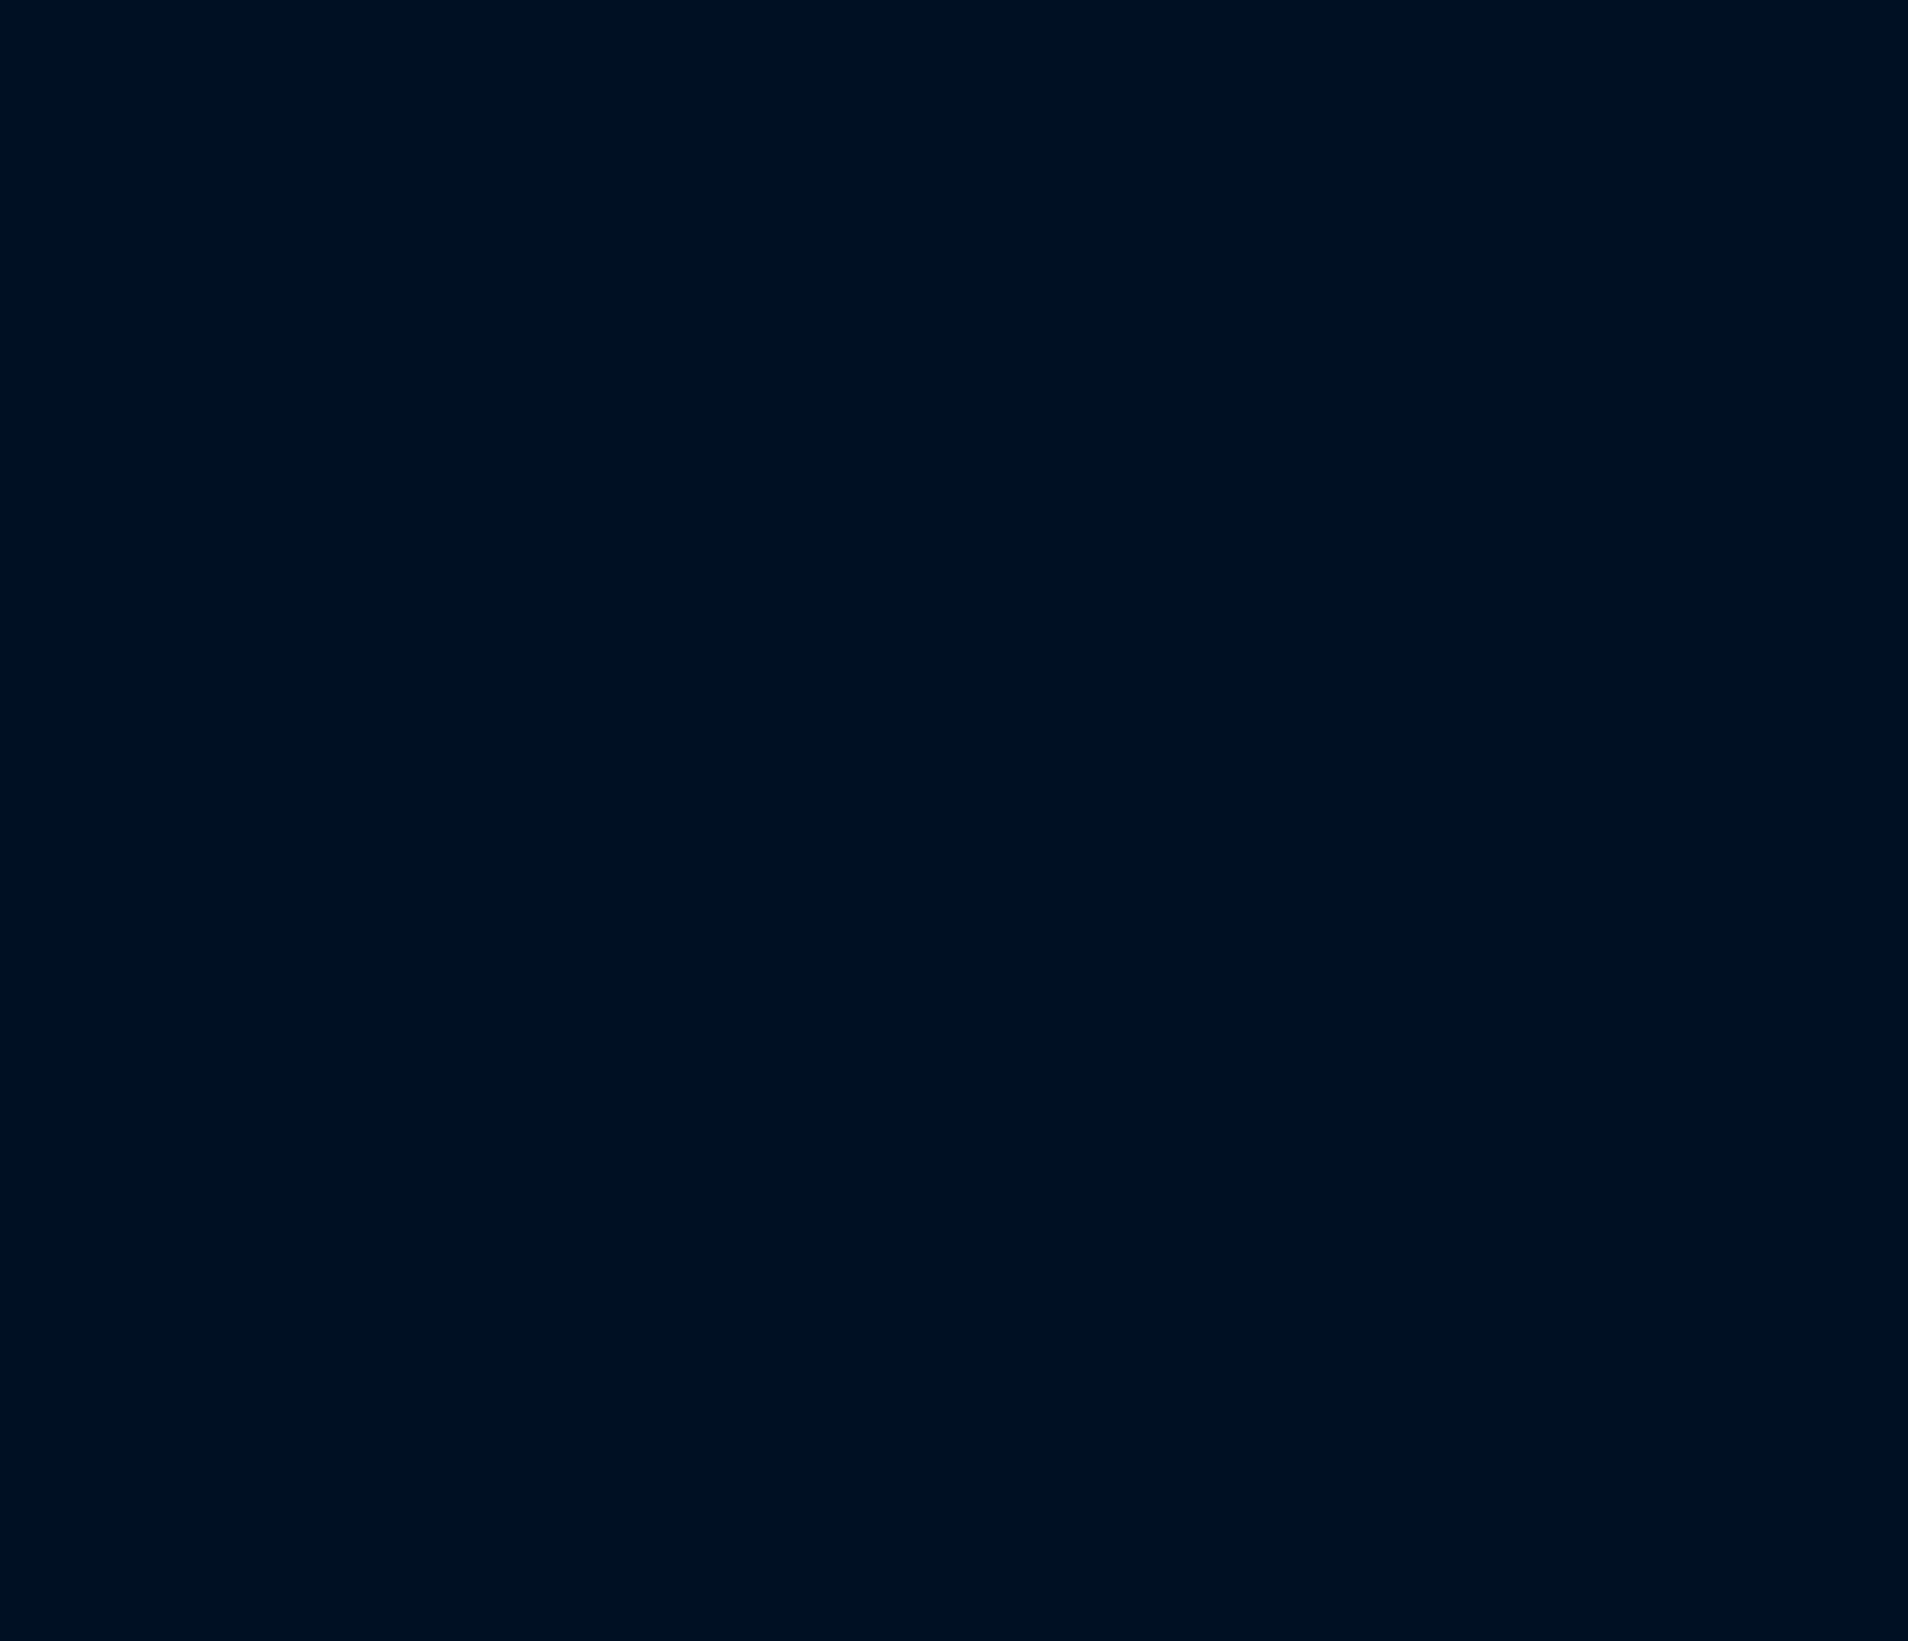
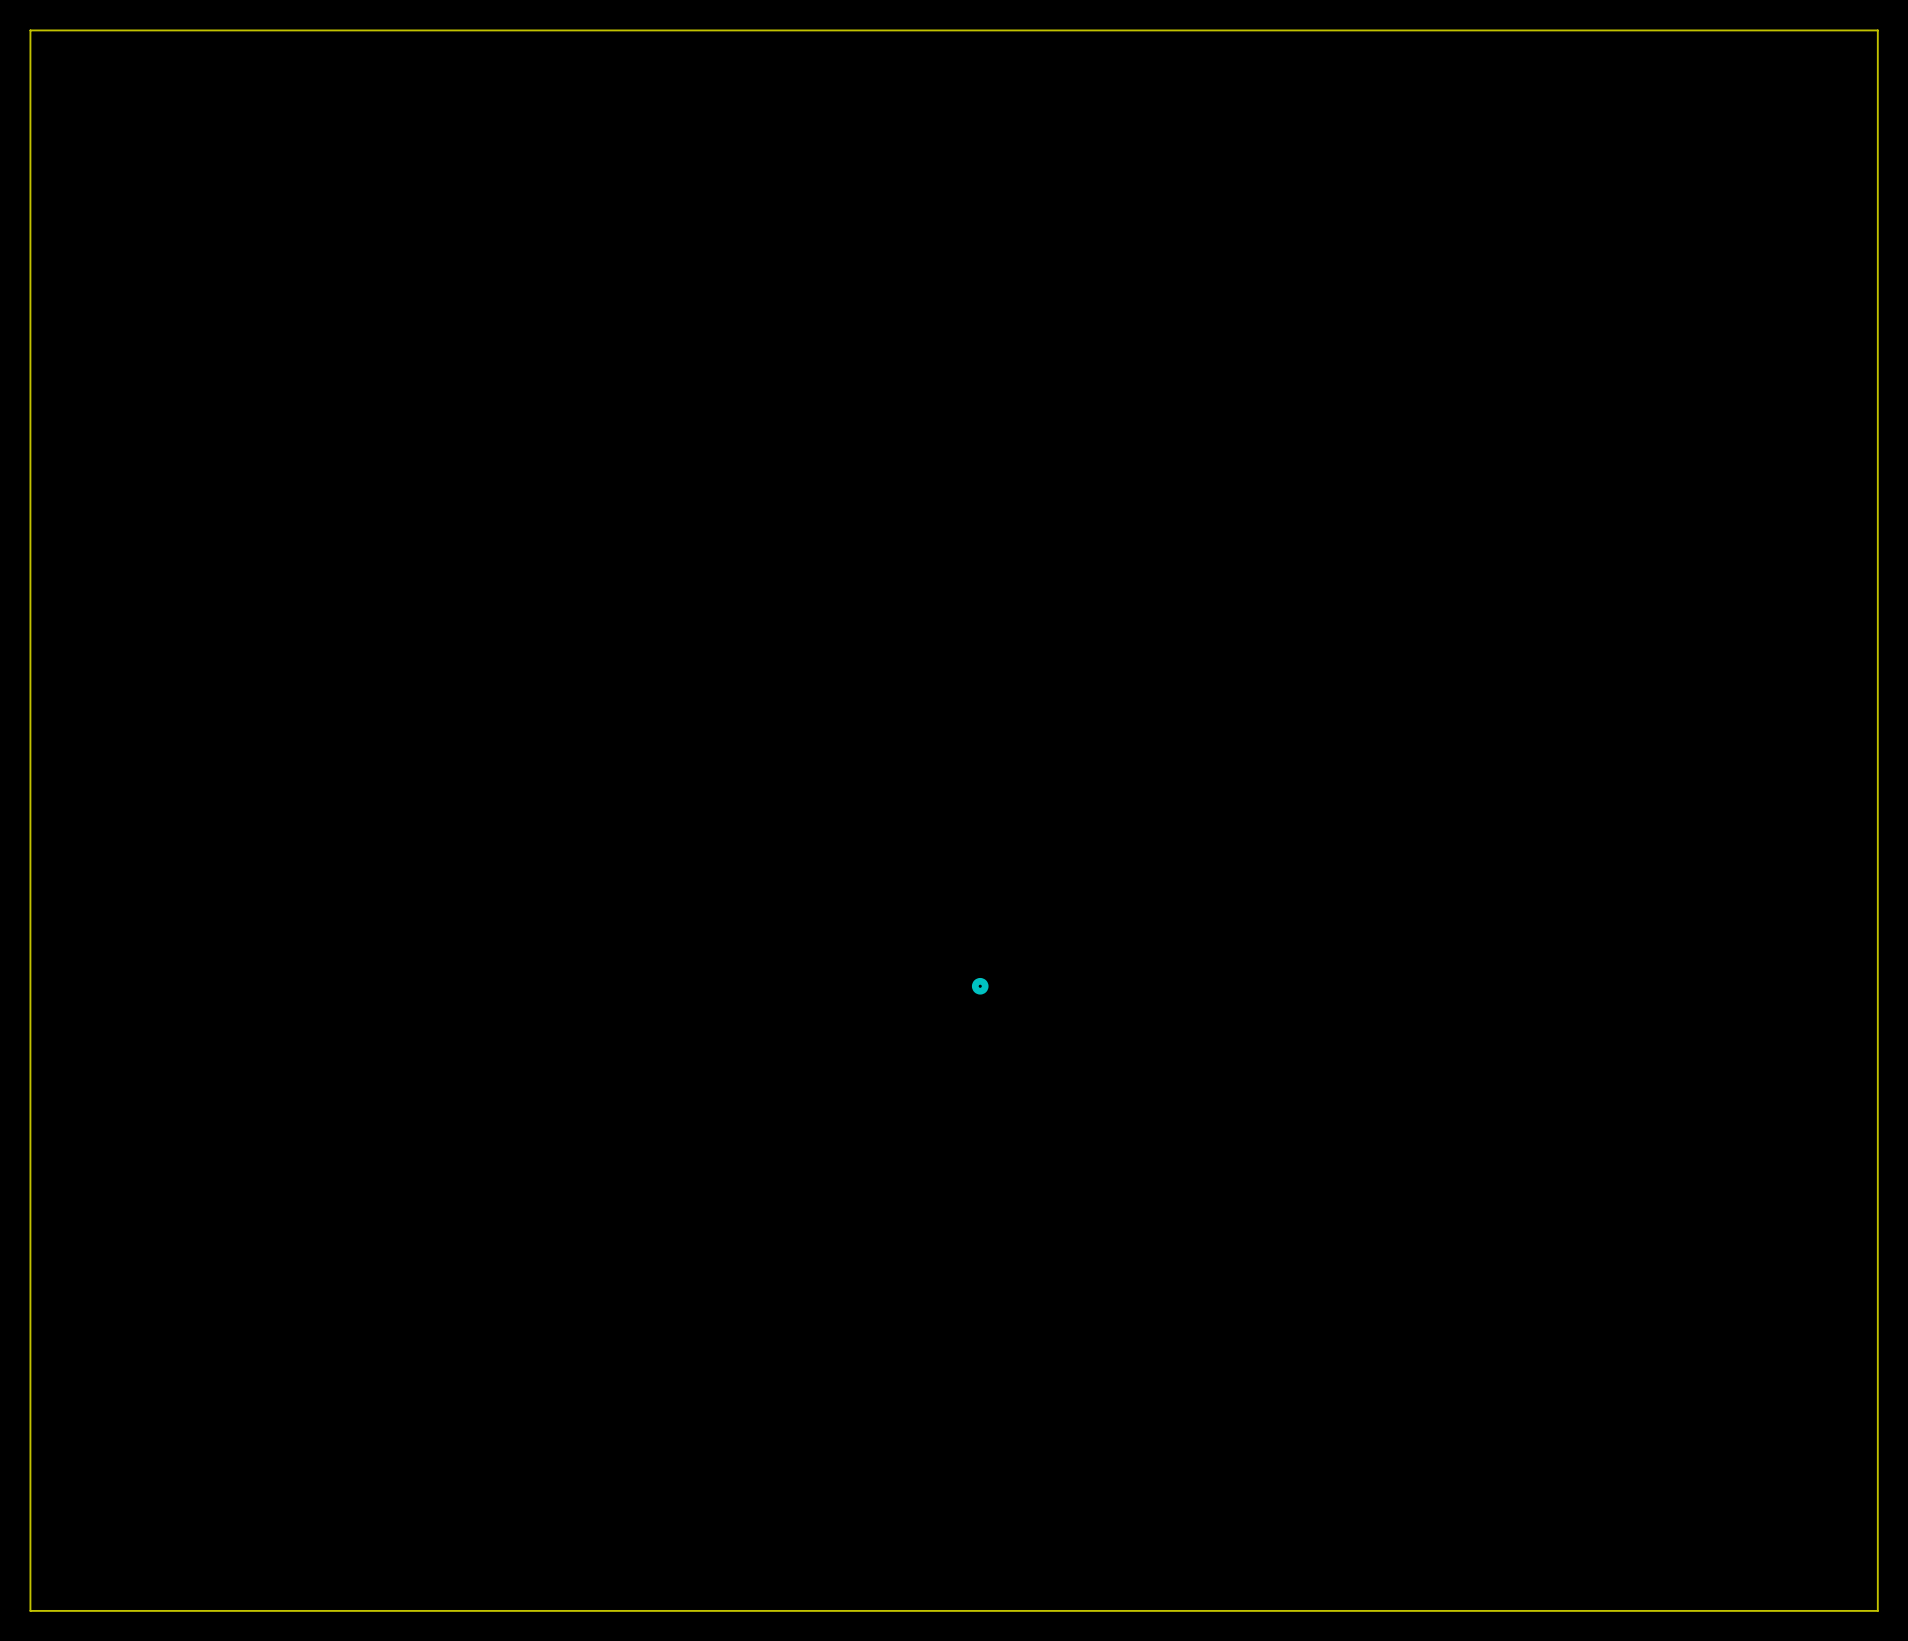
board edge: none -> (1877, 30) (30, 30) (30, 1610) (1877, 1610) (1877, 30)
part: none -> (980, 986)

